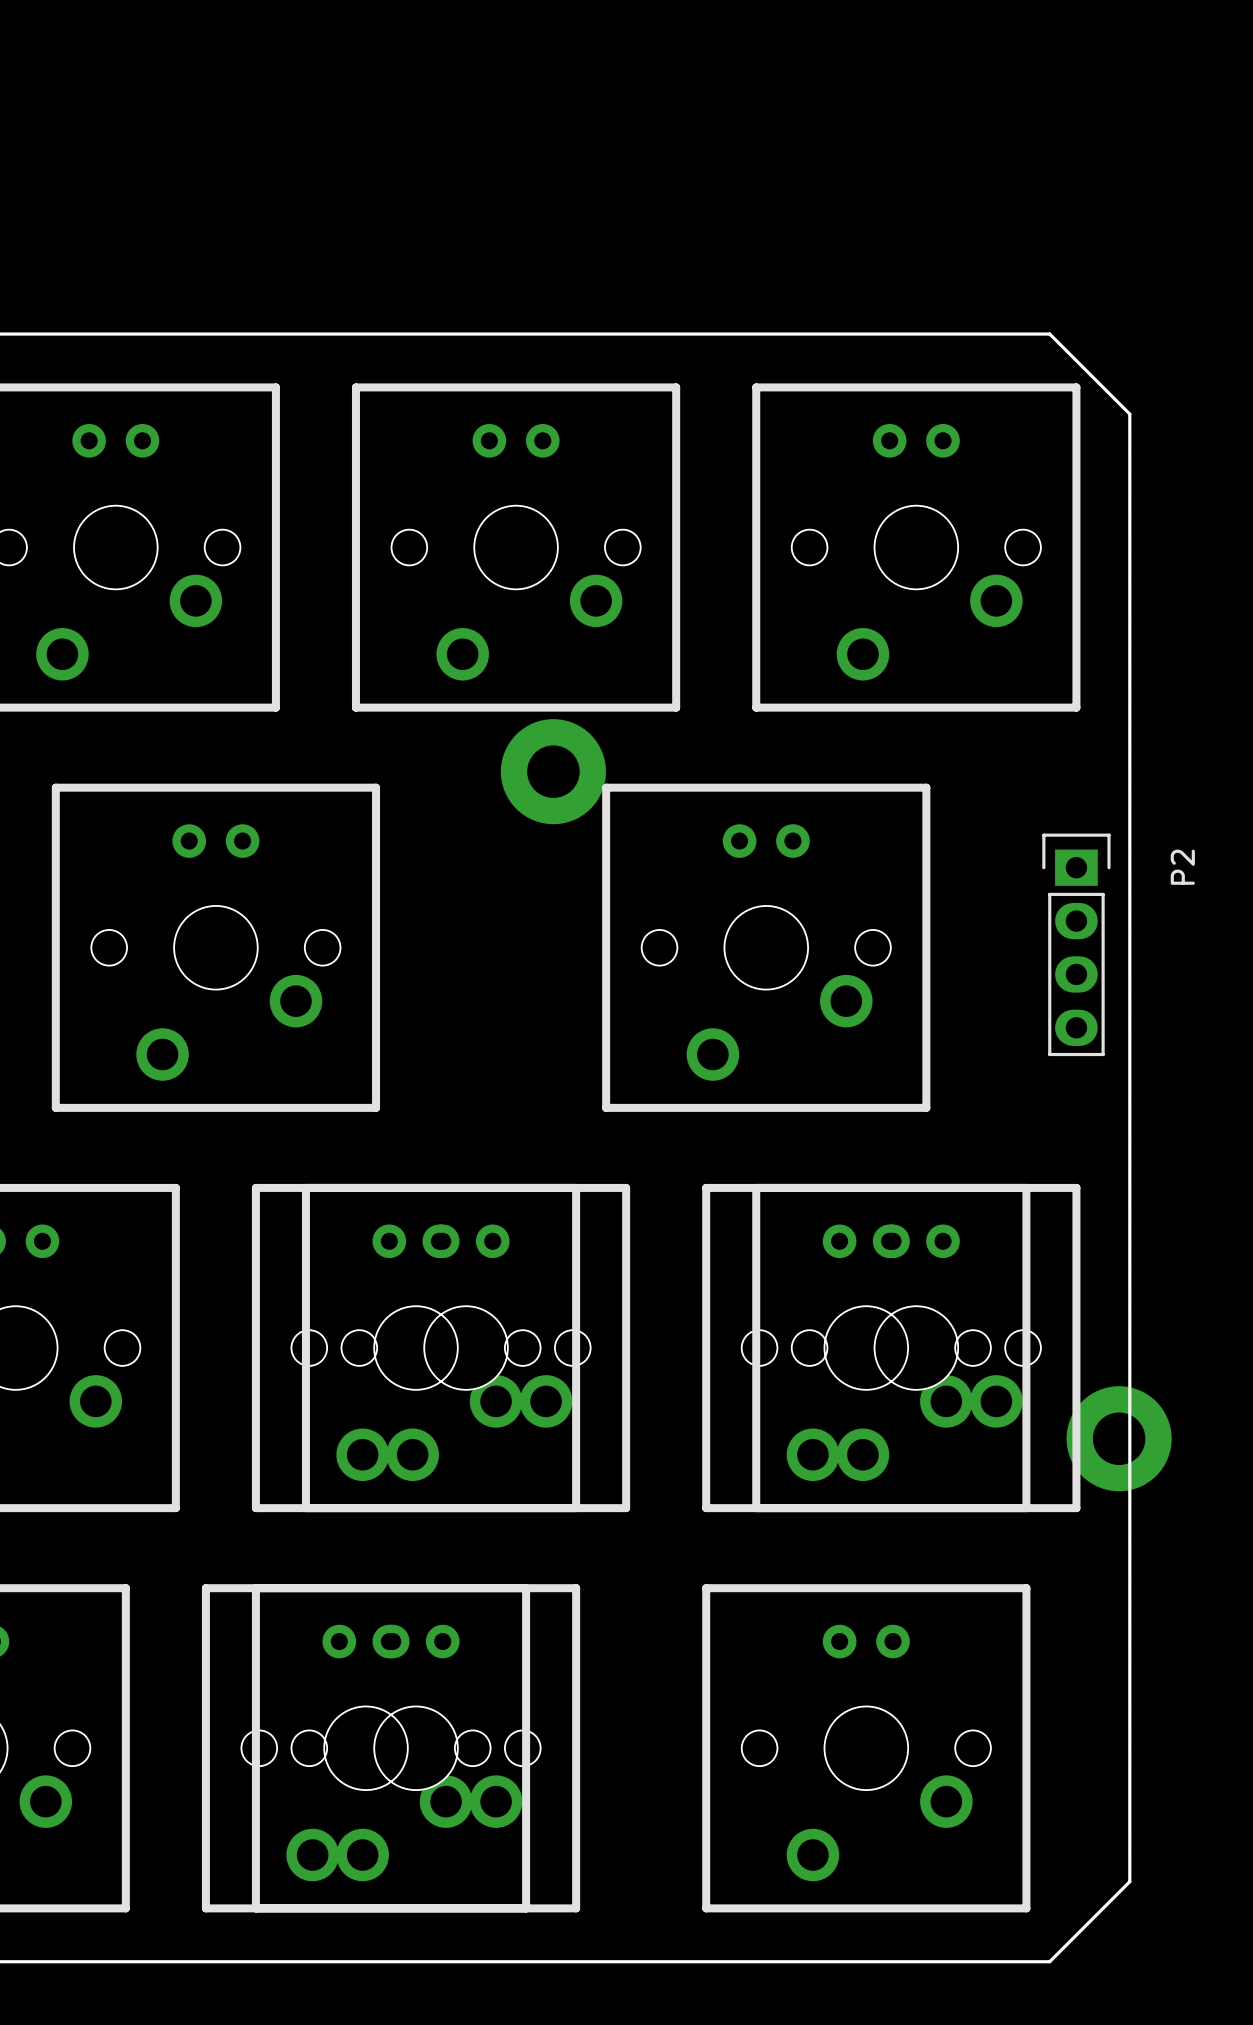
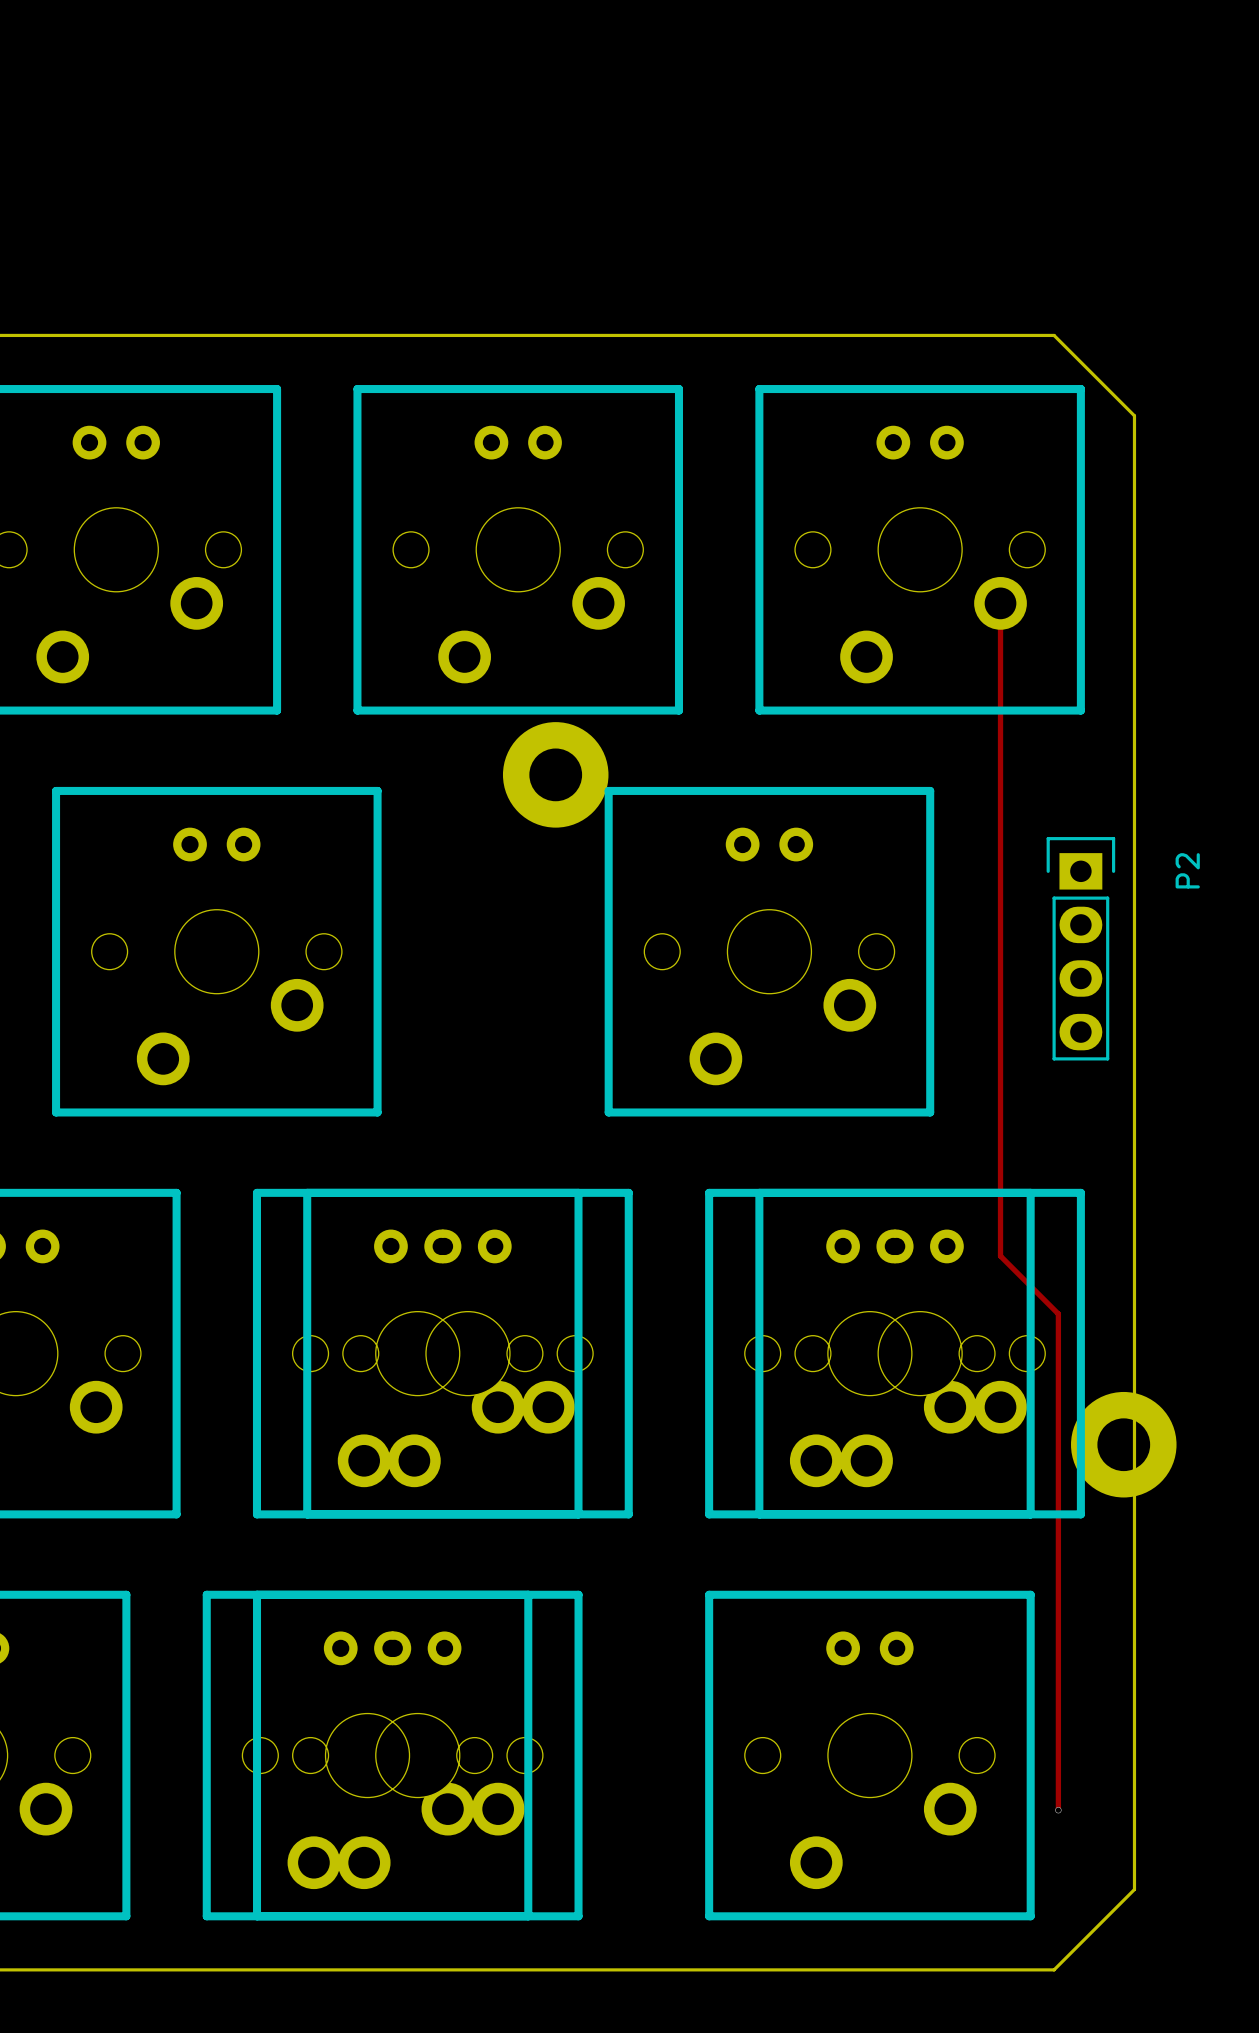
track: none -> (1000, 603) (1000, 1256) (1058, 1313) (1058, 1810)
via: none -> (1058, 1810)

